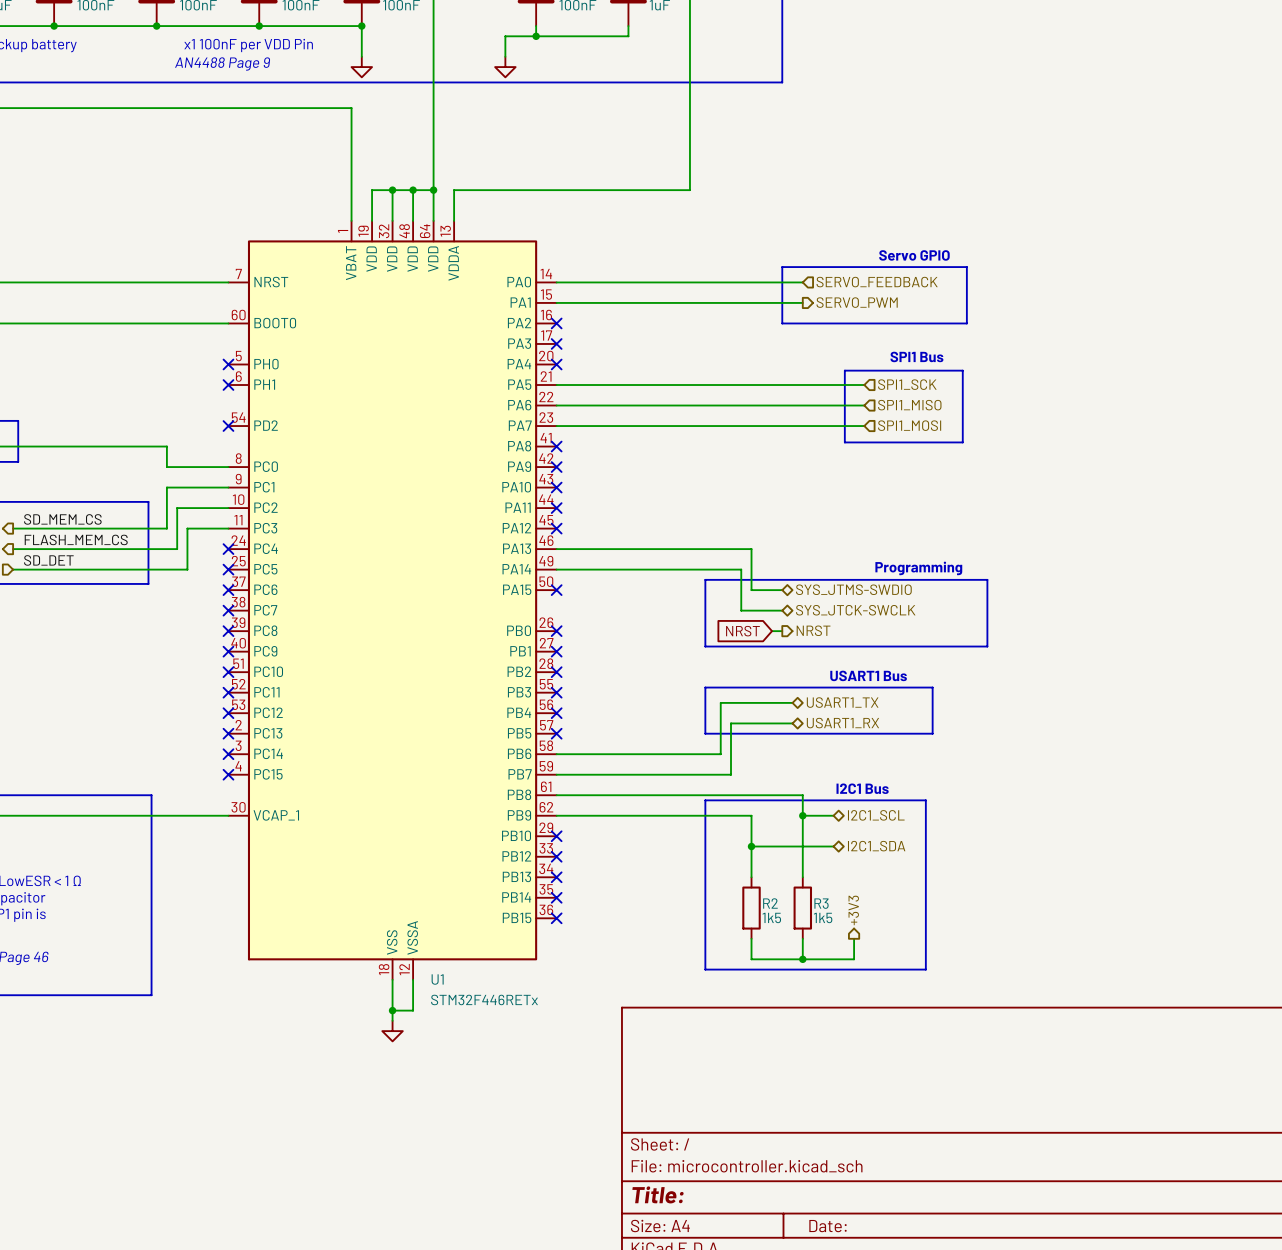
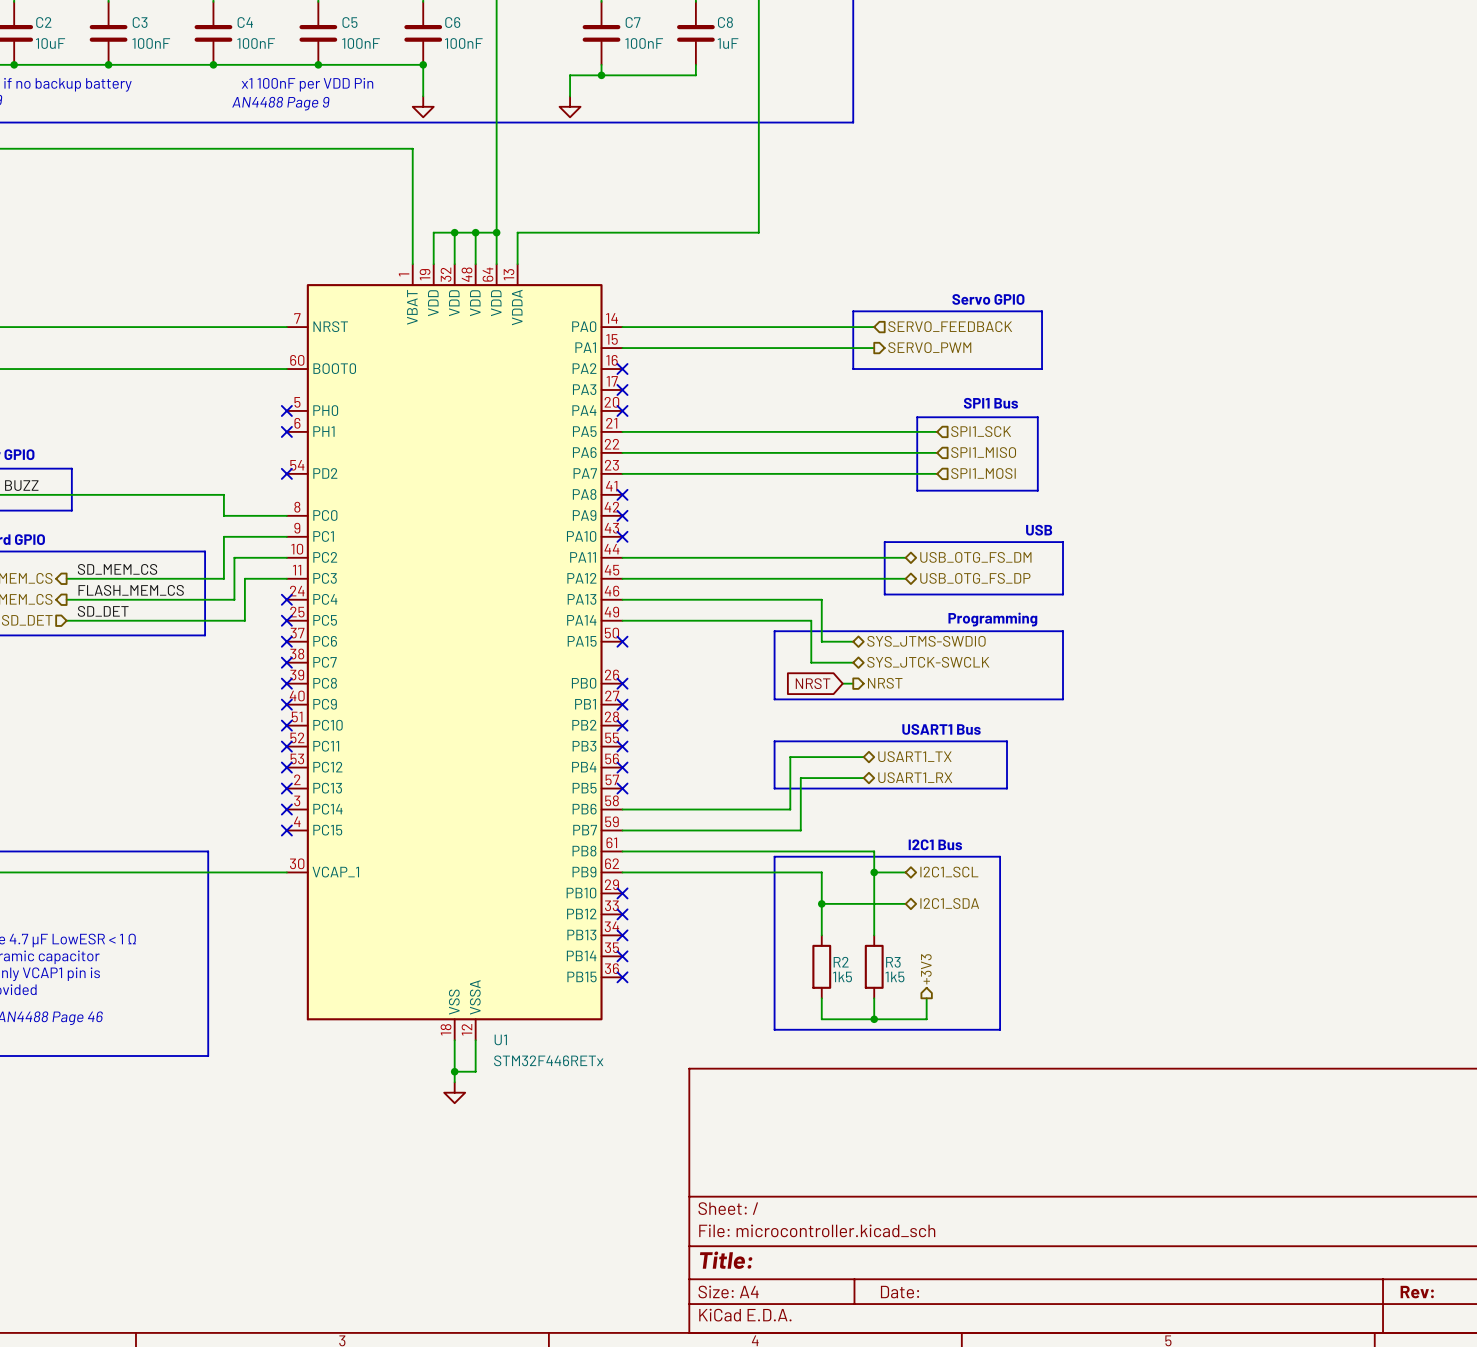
text: none -> USB (1039, 530)
line: none -> (884, 542) (1063, 542) (1063, 594) (884, 594) (884, 542)
hierarchical label: none -> USB_OTG_FS_DM (975, 557)
wire: none -> (622, 557) (905, 557)
no-connect mark: (556, 508) -> none
wire: none -> (622, 578) (905, 578)
no-connect mark: (556, 528) -> none
hierarchical label: none -> USB_OTG_FS_DP (975, 578)

